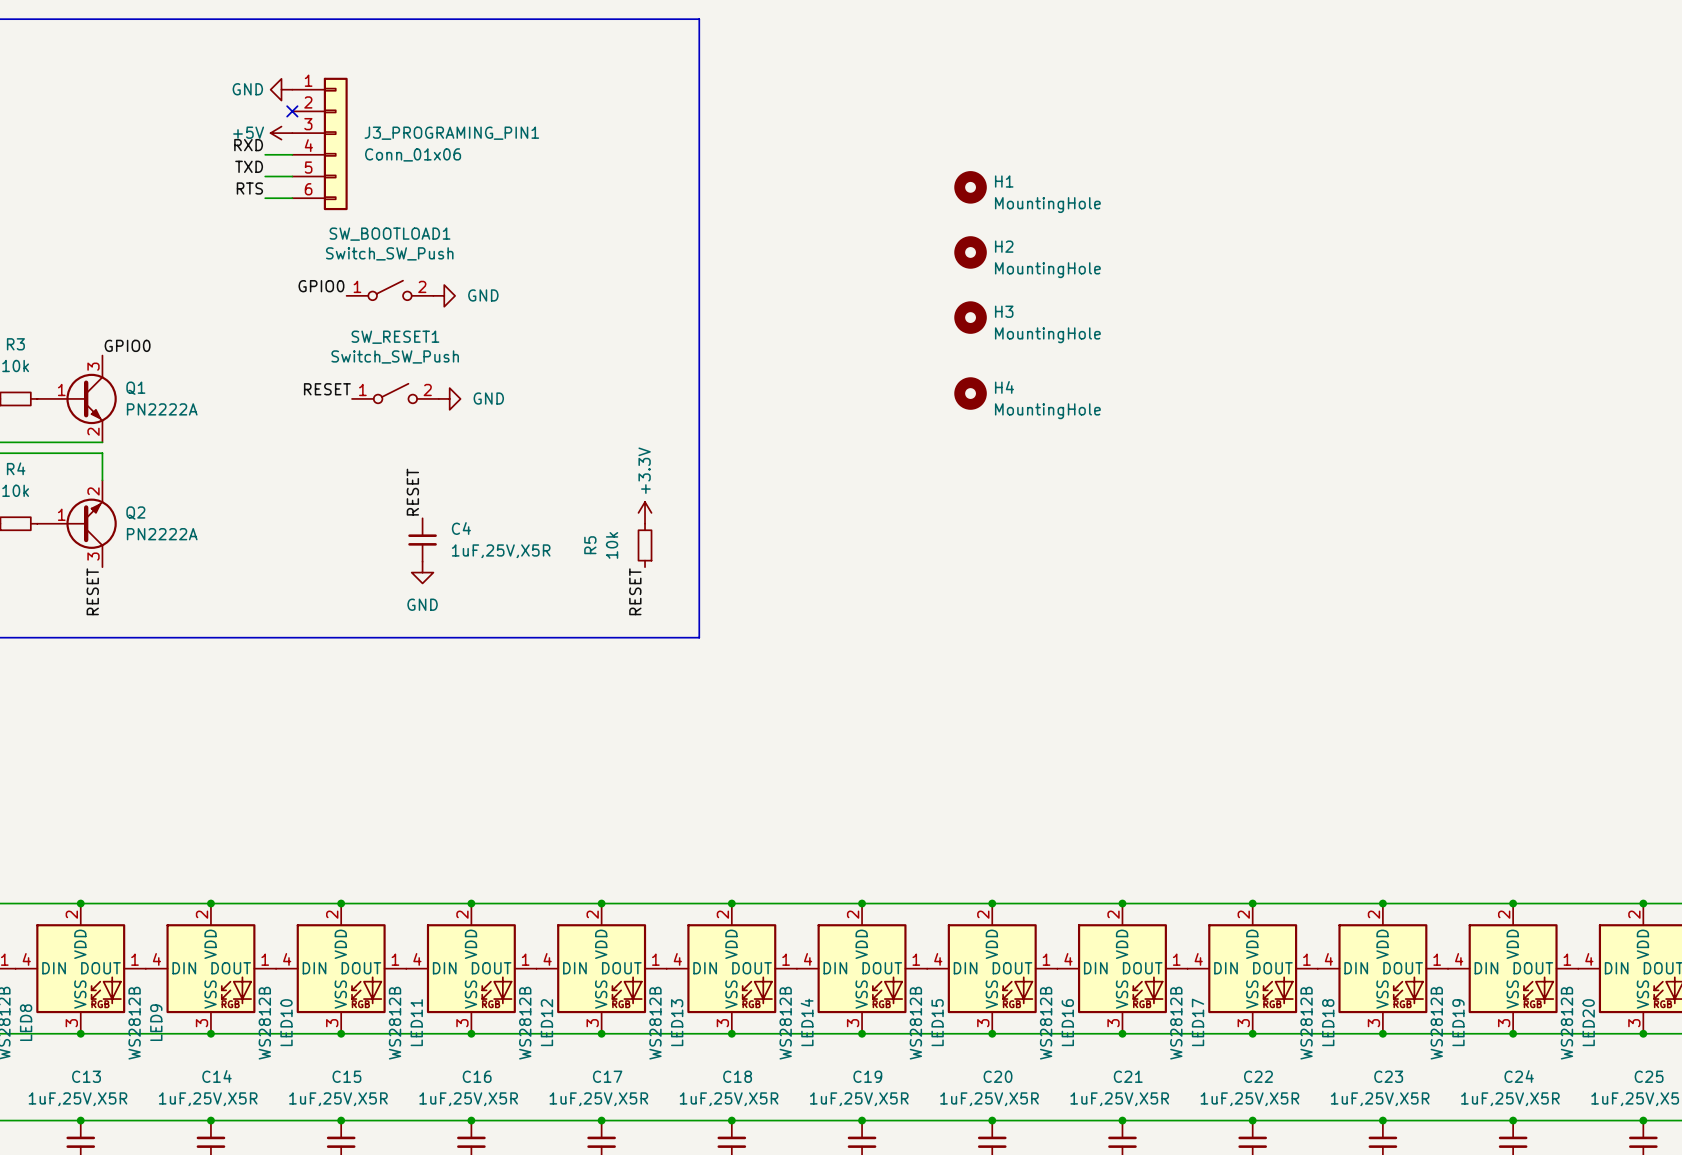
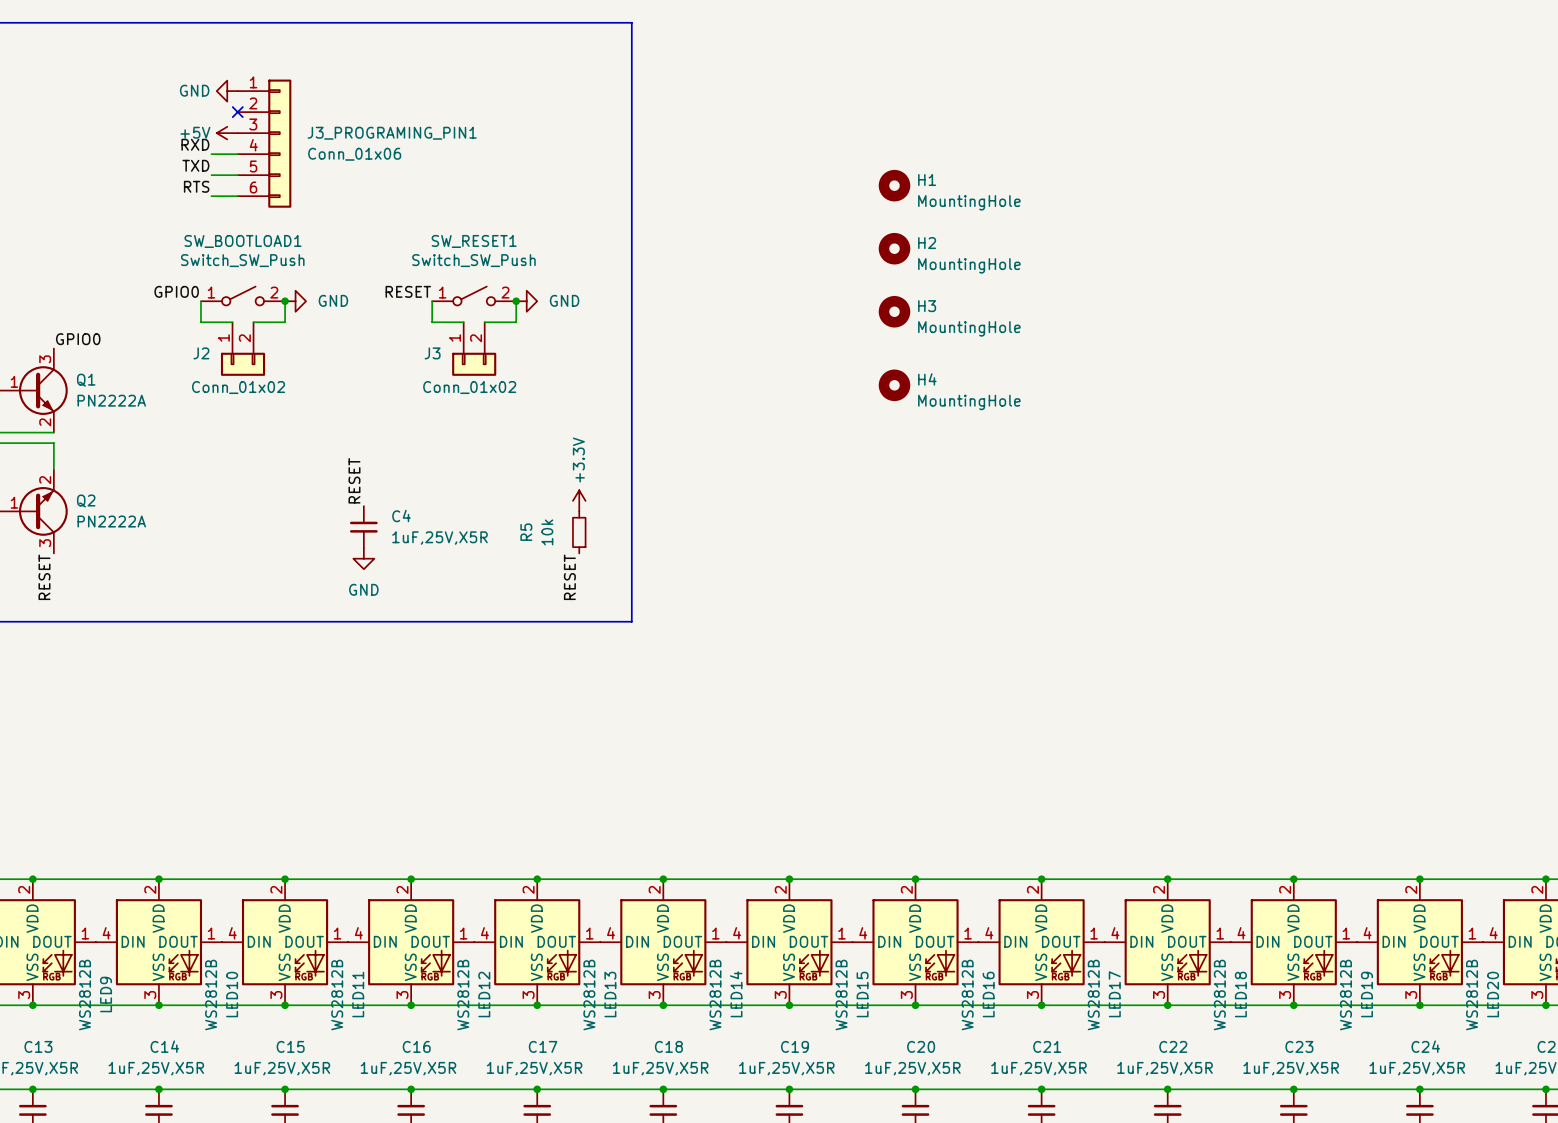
label position: GPIO0 (321, 286) -> GPIO0 (176, 291)
SW_BOOTLOAD1 position: (390, 290) -> (243, 295)
power symbol: GND (444, 295) -> none
wire: none -> (200, 301) (200, 322) (232, 322)
wire: none -> (285, 301) (285, 322) (253, 322)
junction: none -> (285, 301)
power symbol: none -> GND (295, 301)
wire: none -> (432, 301) (432, 322) (463, 322)
wire: none -> (516, 301) (516, 322) (484, 322)
junction: none -> (516, 301)
power symbol: none -> GND (526, 301)
J2: none -> Conn_01x02 (243, 349)
J3: none -> Conn_01x02 (474, 349)
label position: RESET (327, 389) -> RESET (408, 291)
SW_RESET1 position: (395, 393) -> (474, 295)
power symbol: GND (449, 398) -> none

